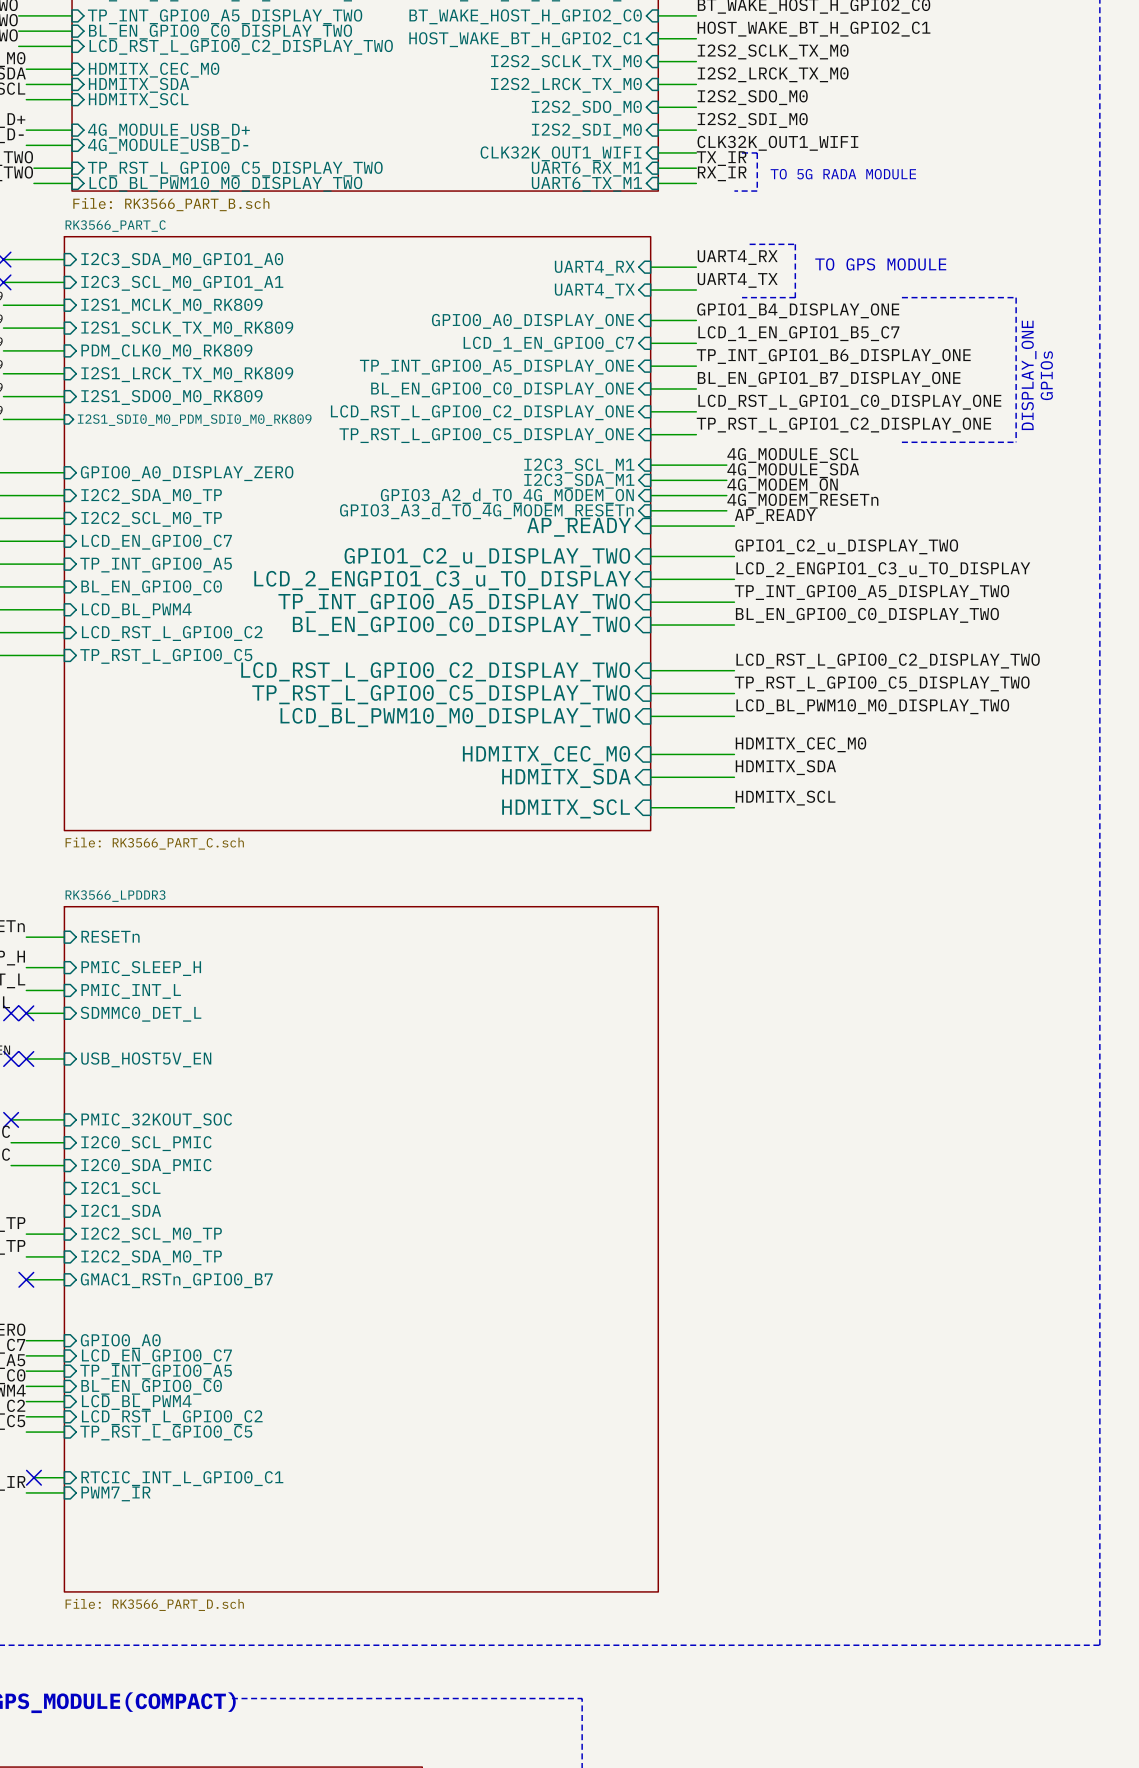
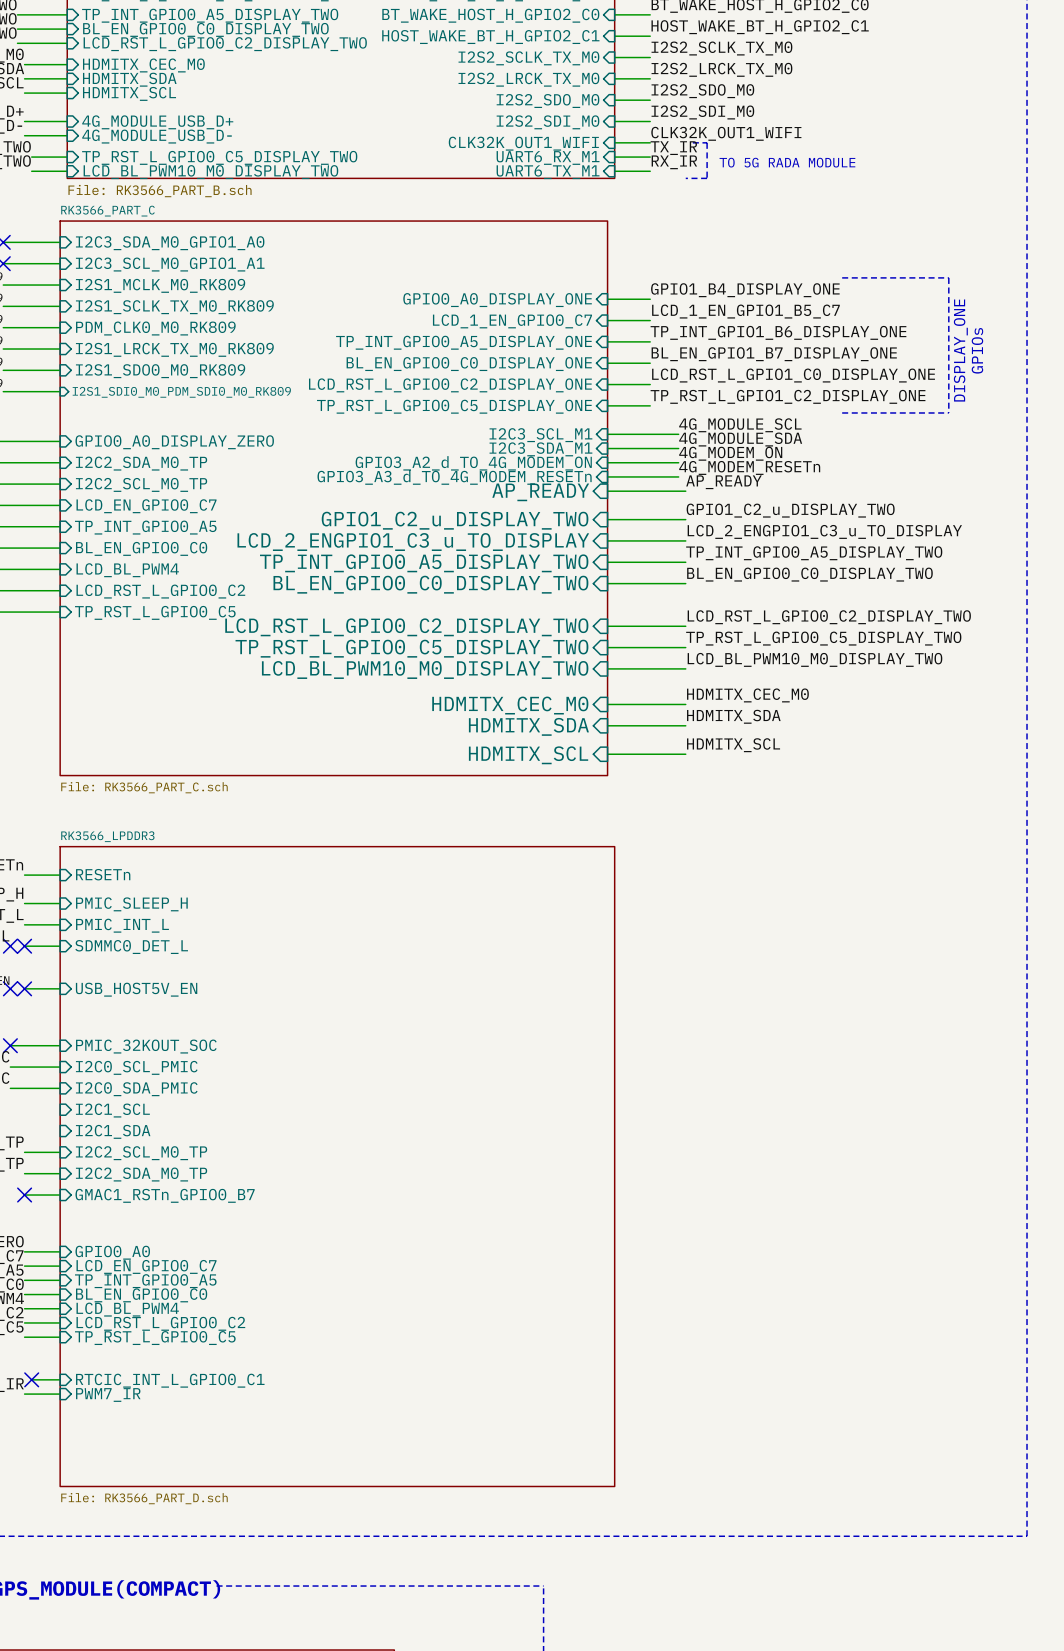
line: (749, 244) (795, 244) (795, 297) (742, 297) -> none
label: UART4_RX (737, 257) -> none
text: TO GPS MODULE (880, 264) -> none
wire: (650, 267) (696, 267) -> none
sheet pin: UART4_RX (594, 268) -> none
label: UART4_TX (737, 280) -> none
wire: (650, 290) (696, 290) -> none
sheet pin: UART4_TX (594, 291) -> none

